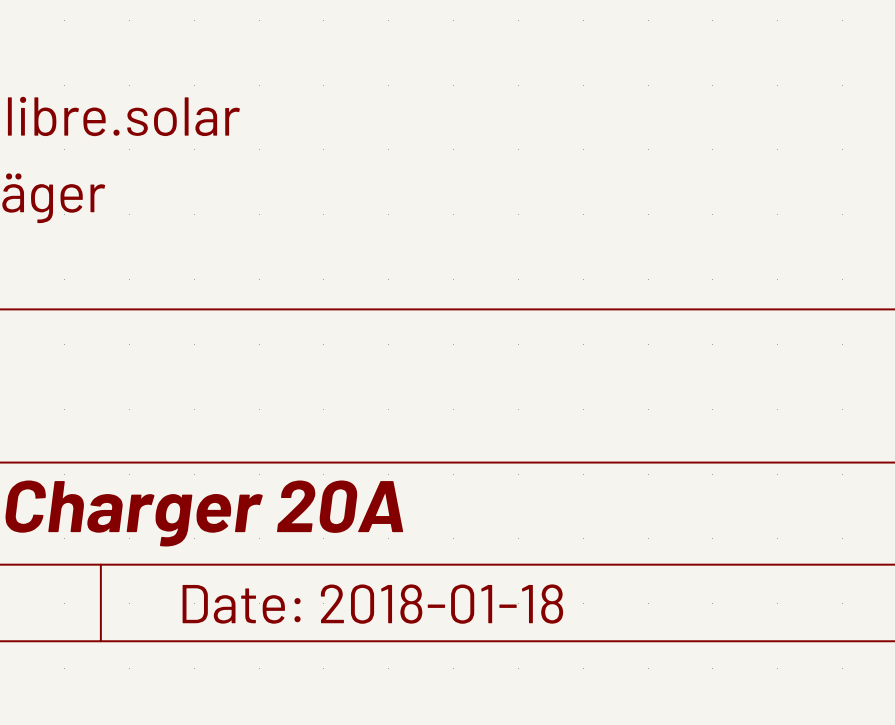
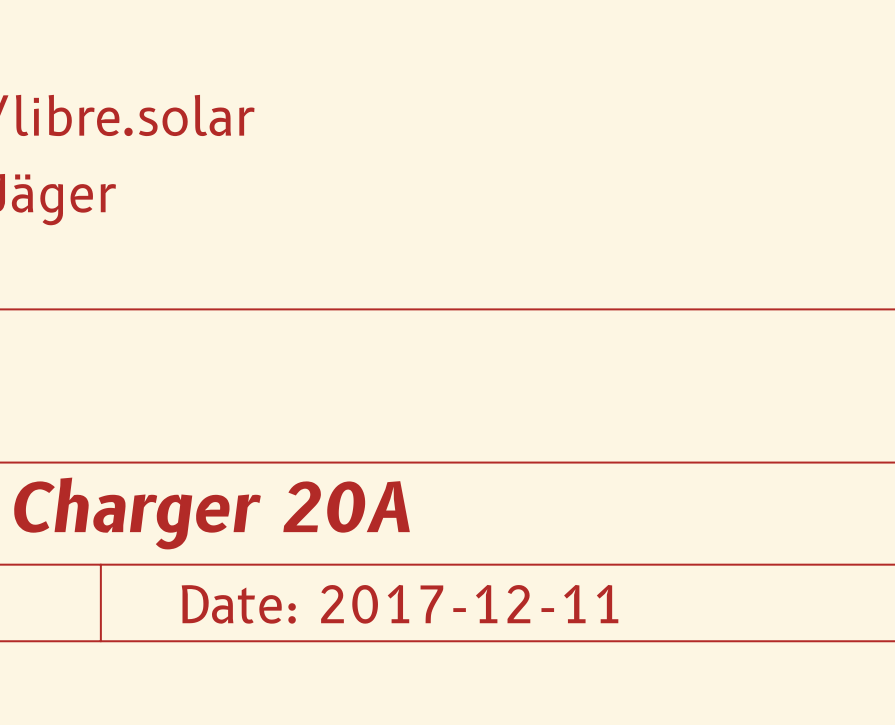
title block: Date: 2018-01-18 (372, 604) -> Date: 2017-12-11 (400, 604)

